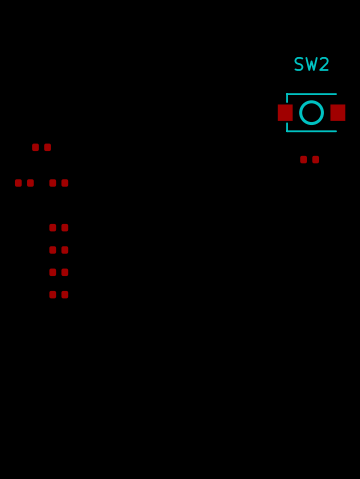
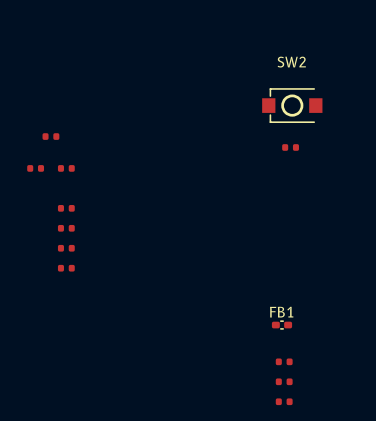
FB1: none -> (281, 325)
part: none -> (284, 361)
part: none -> (284, 381)
part: none -> (284, 401)

